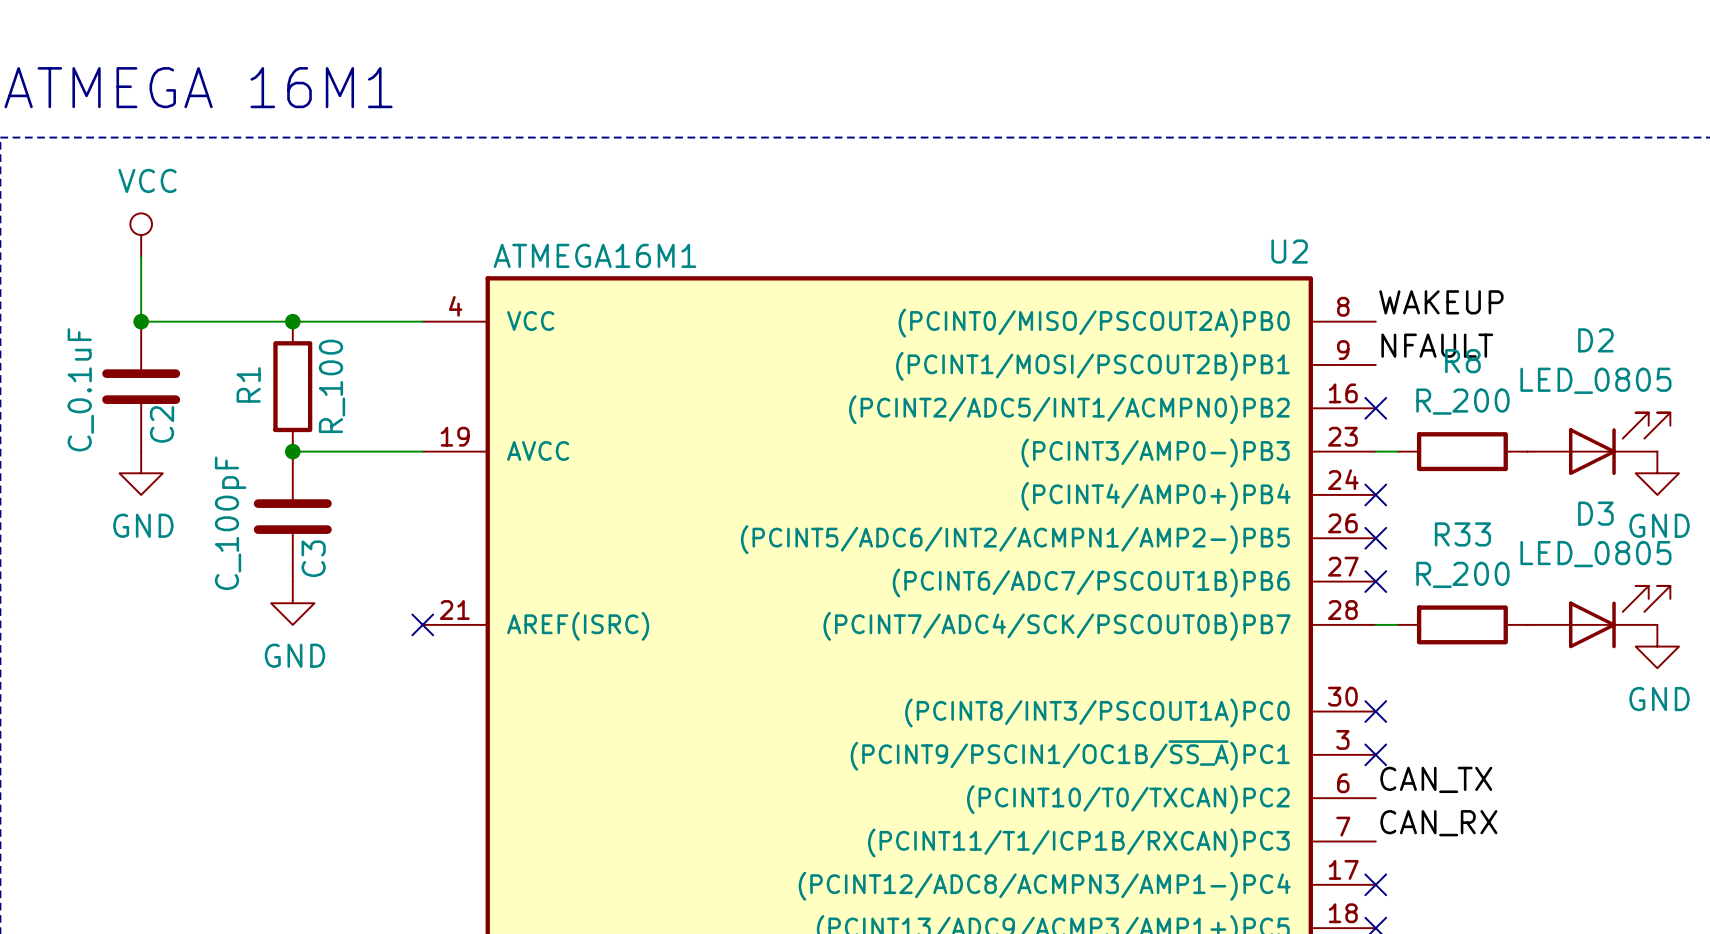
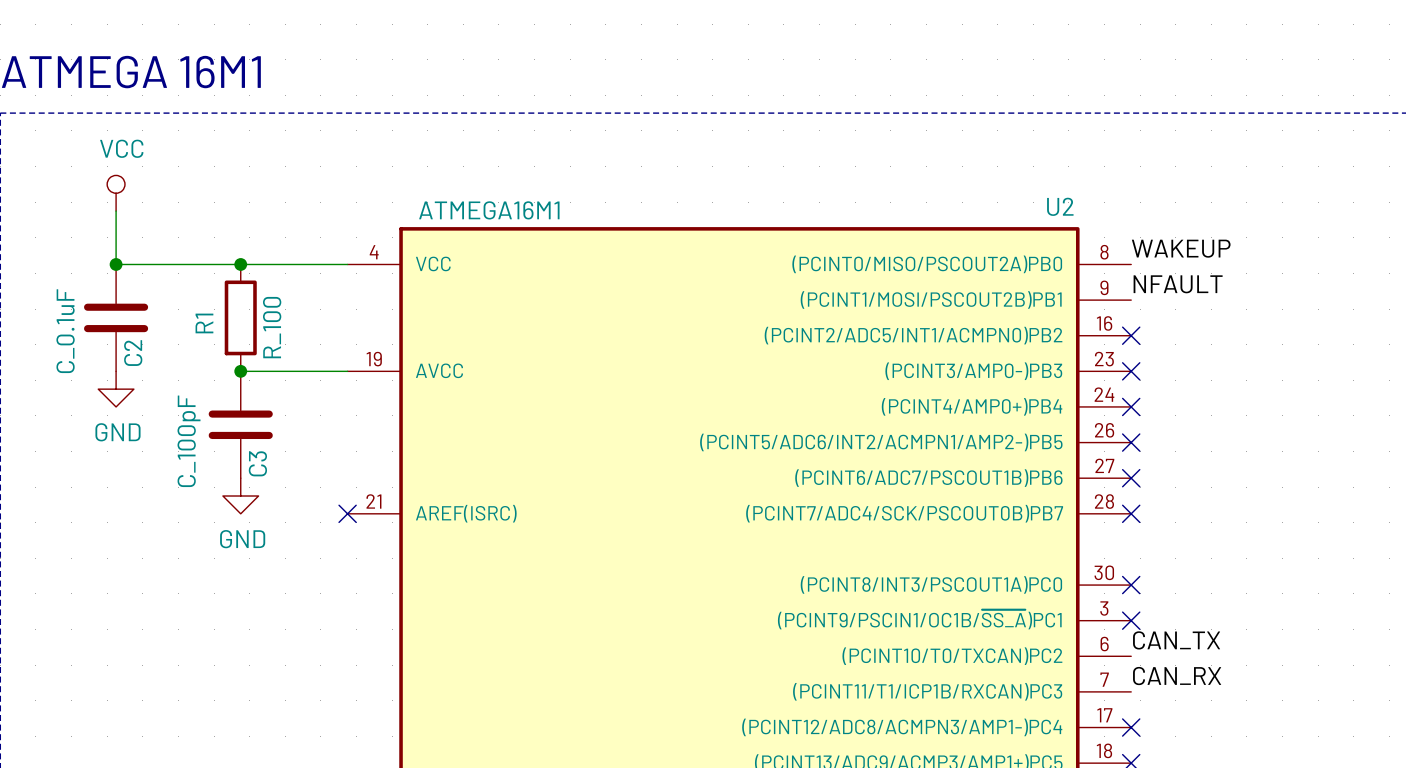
D2: LED_0805 (1598, 443) -> none
wire: (1375, 451) (1397, 451) -> none
no-connect mark: none -> (1131, 371)
R8: R_200 (1462, 451) -> none
power symbol: GND (1657, 473) -> none
D3: LED_0805 (1598, 617) -> none
wire: (1375, 624) (1397, 624) -> none
no-connect mark: none -> (1131, 513)
R33: R_200 (1462, 624) -> none
power symbol: GND (1657, 646) -> none

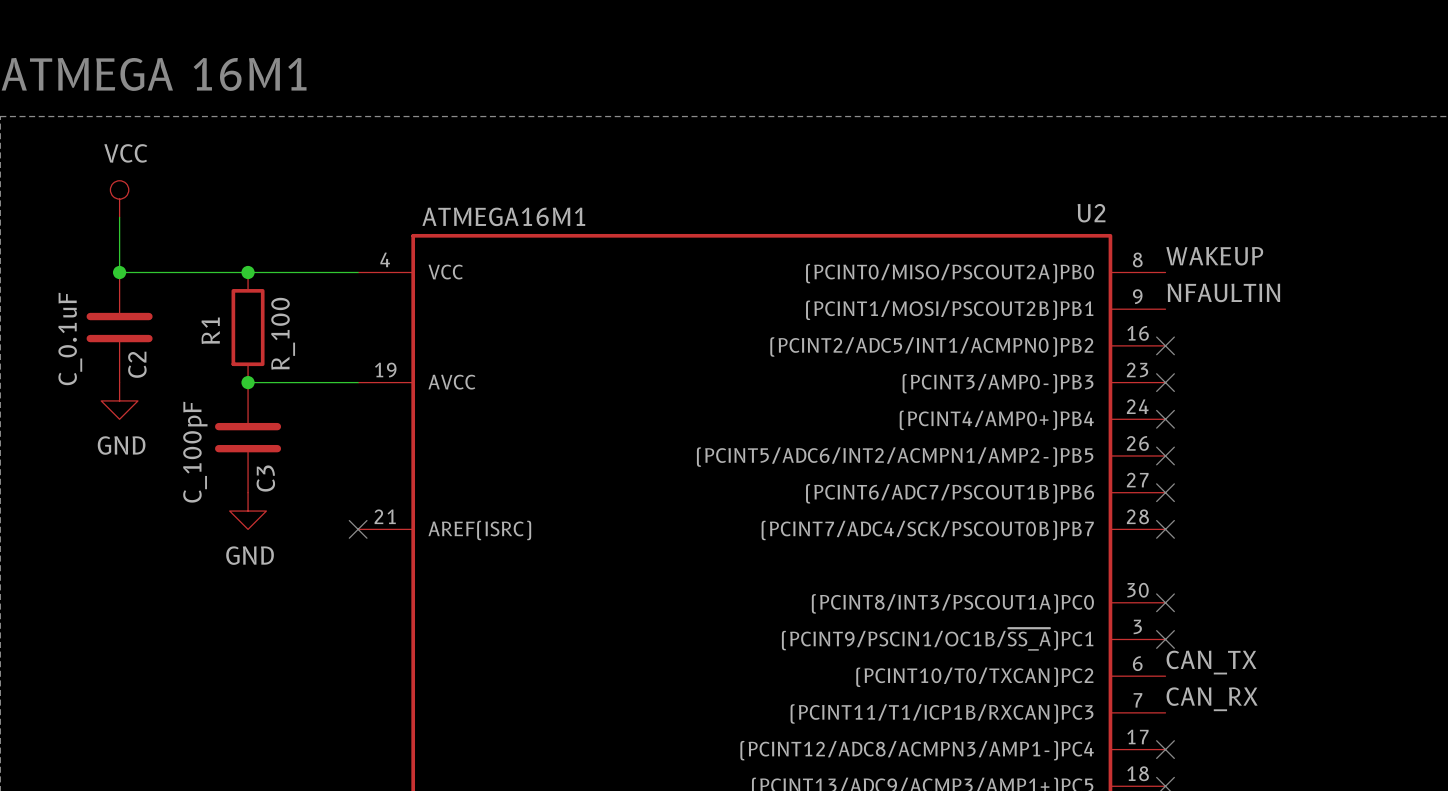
label: NFAULT (1178, 284) -> NFAULTIN (1223, 292)

